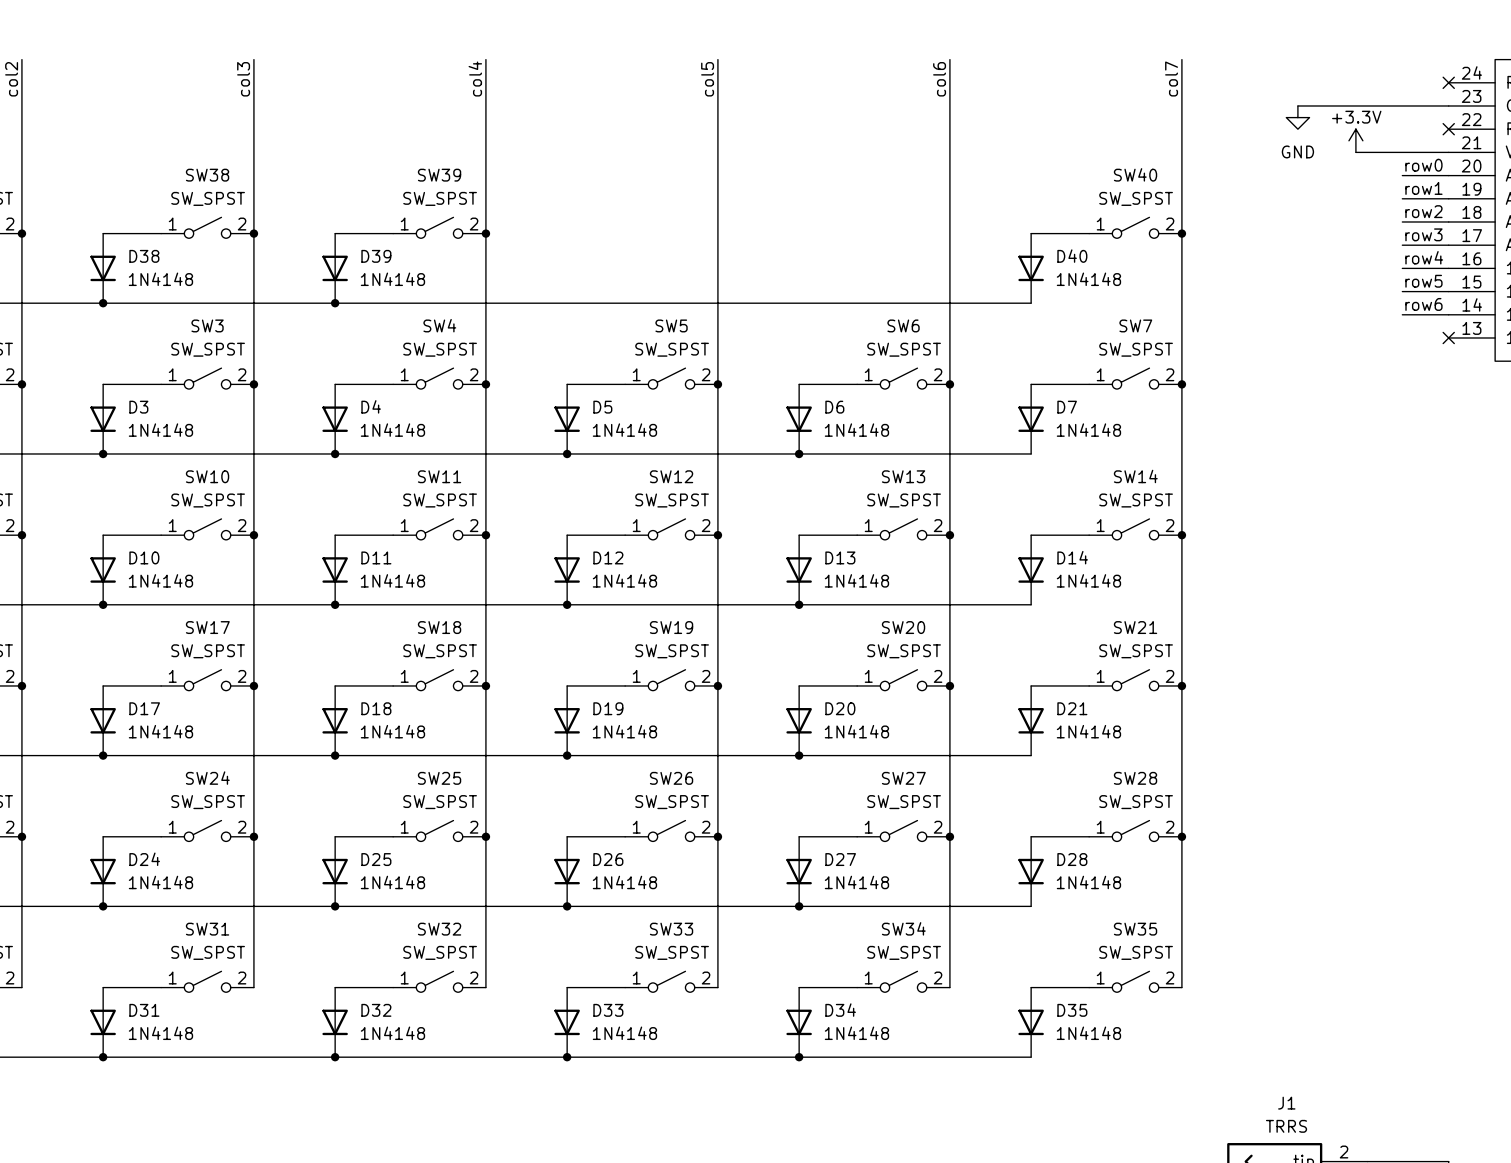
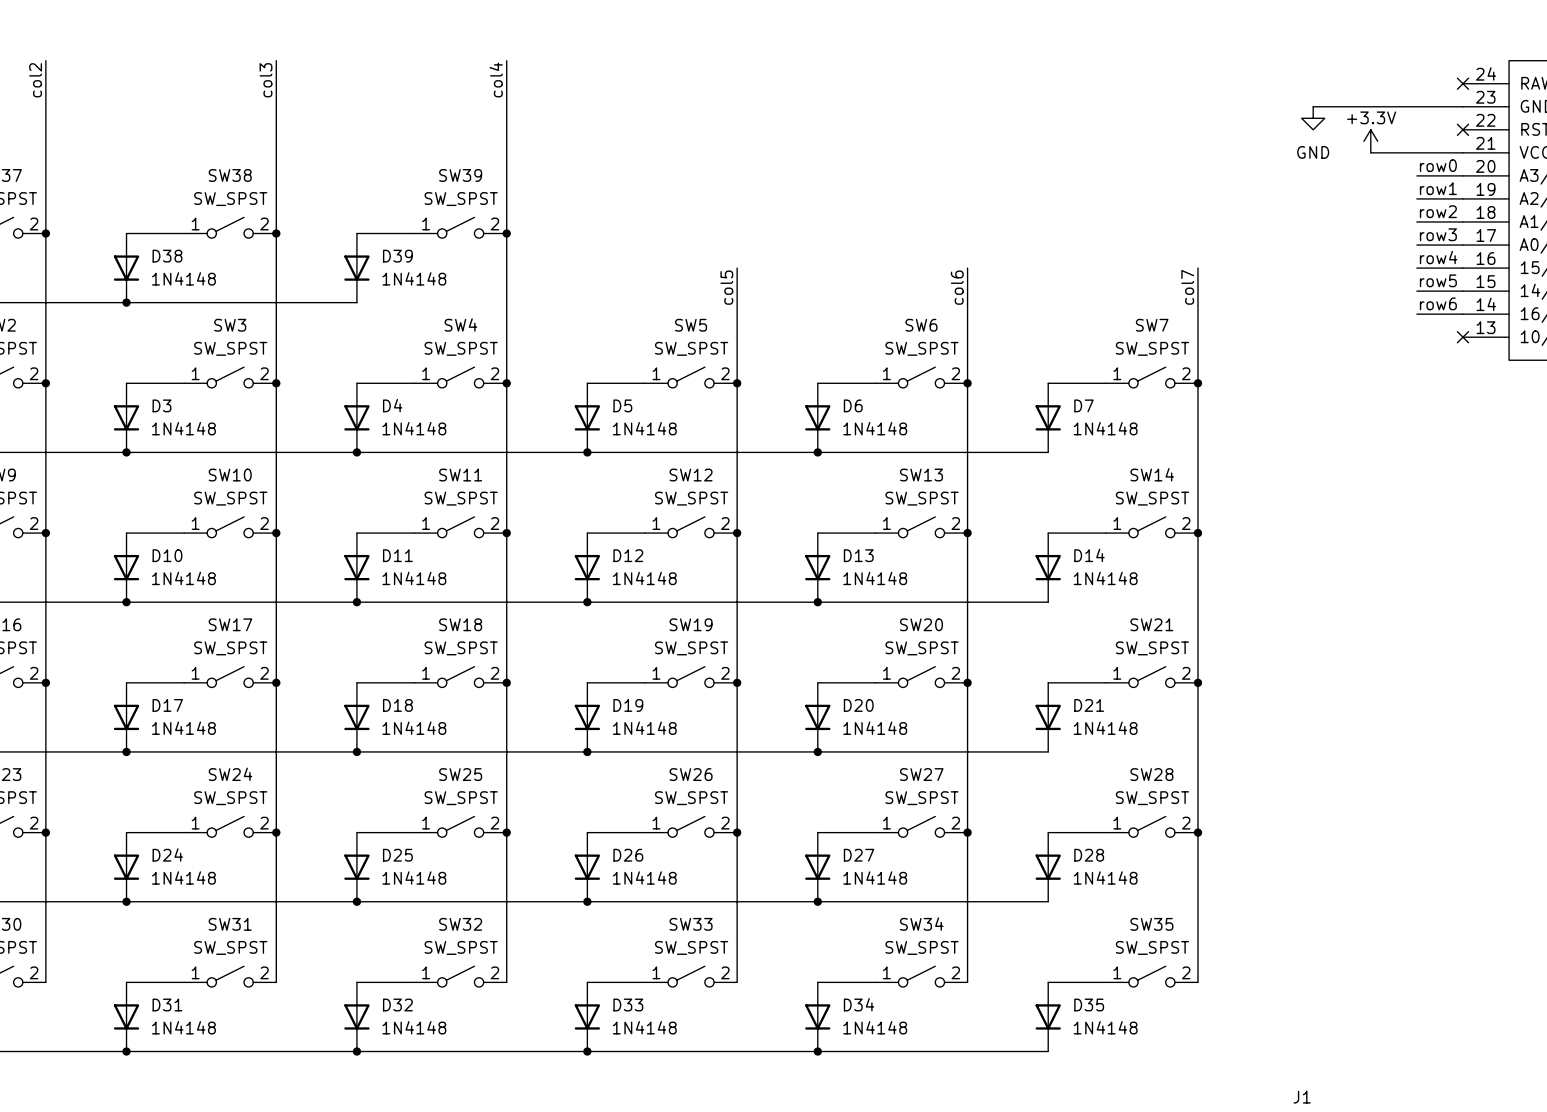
wire: (717, 59) (717, 268) -> none
wire: (949, 59) (949, 268) -> none
wire: (1181, 59) (1181, 268) -> none
label position: col5 (707, 79) -> col5 (726, 287)
label position: col6 (939, 79) -> col6 (957, 287)
label position: col7 (1171, 79) -> col7 (1187, 287)
SW40: SW_SPST (1135, 227) -> none
wire: (1031, 233) (1089, 233) -> none
junction: (1181, 233) -> none
D40: 1N4148 (1031, 268) -> none
wire: (335, 303) (1031, 303) -> none
junction: (335, 303) -> none

